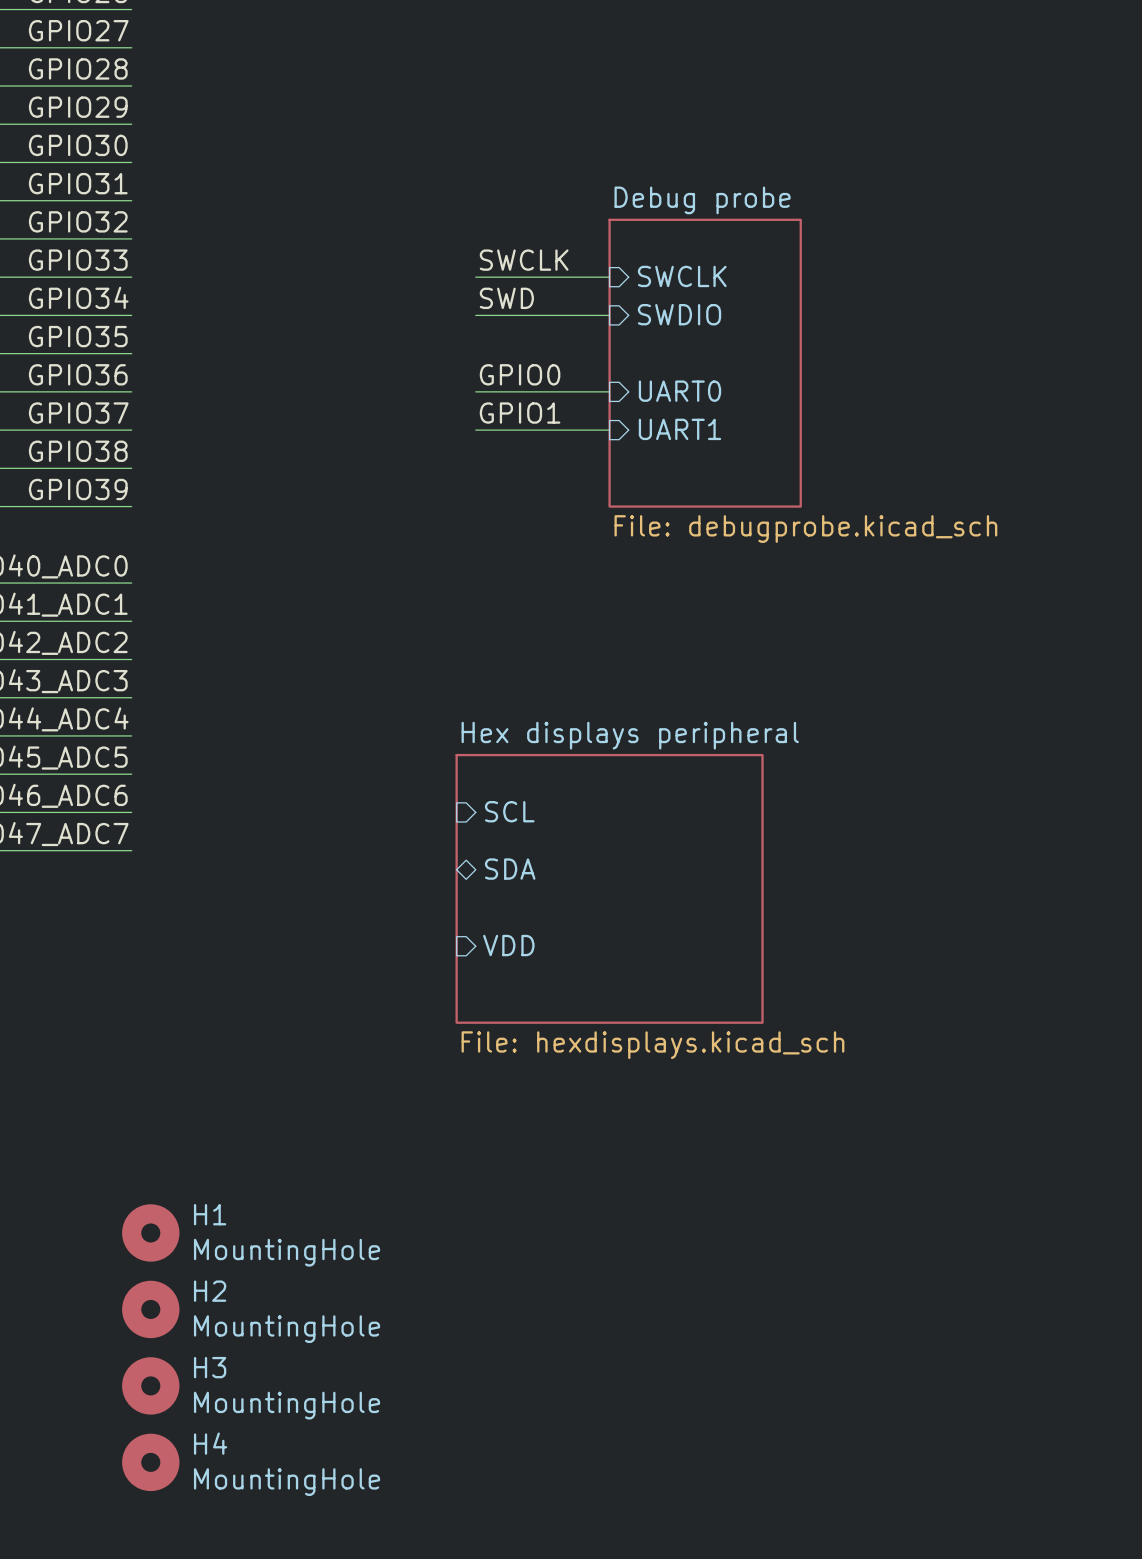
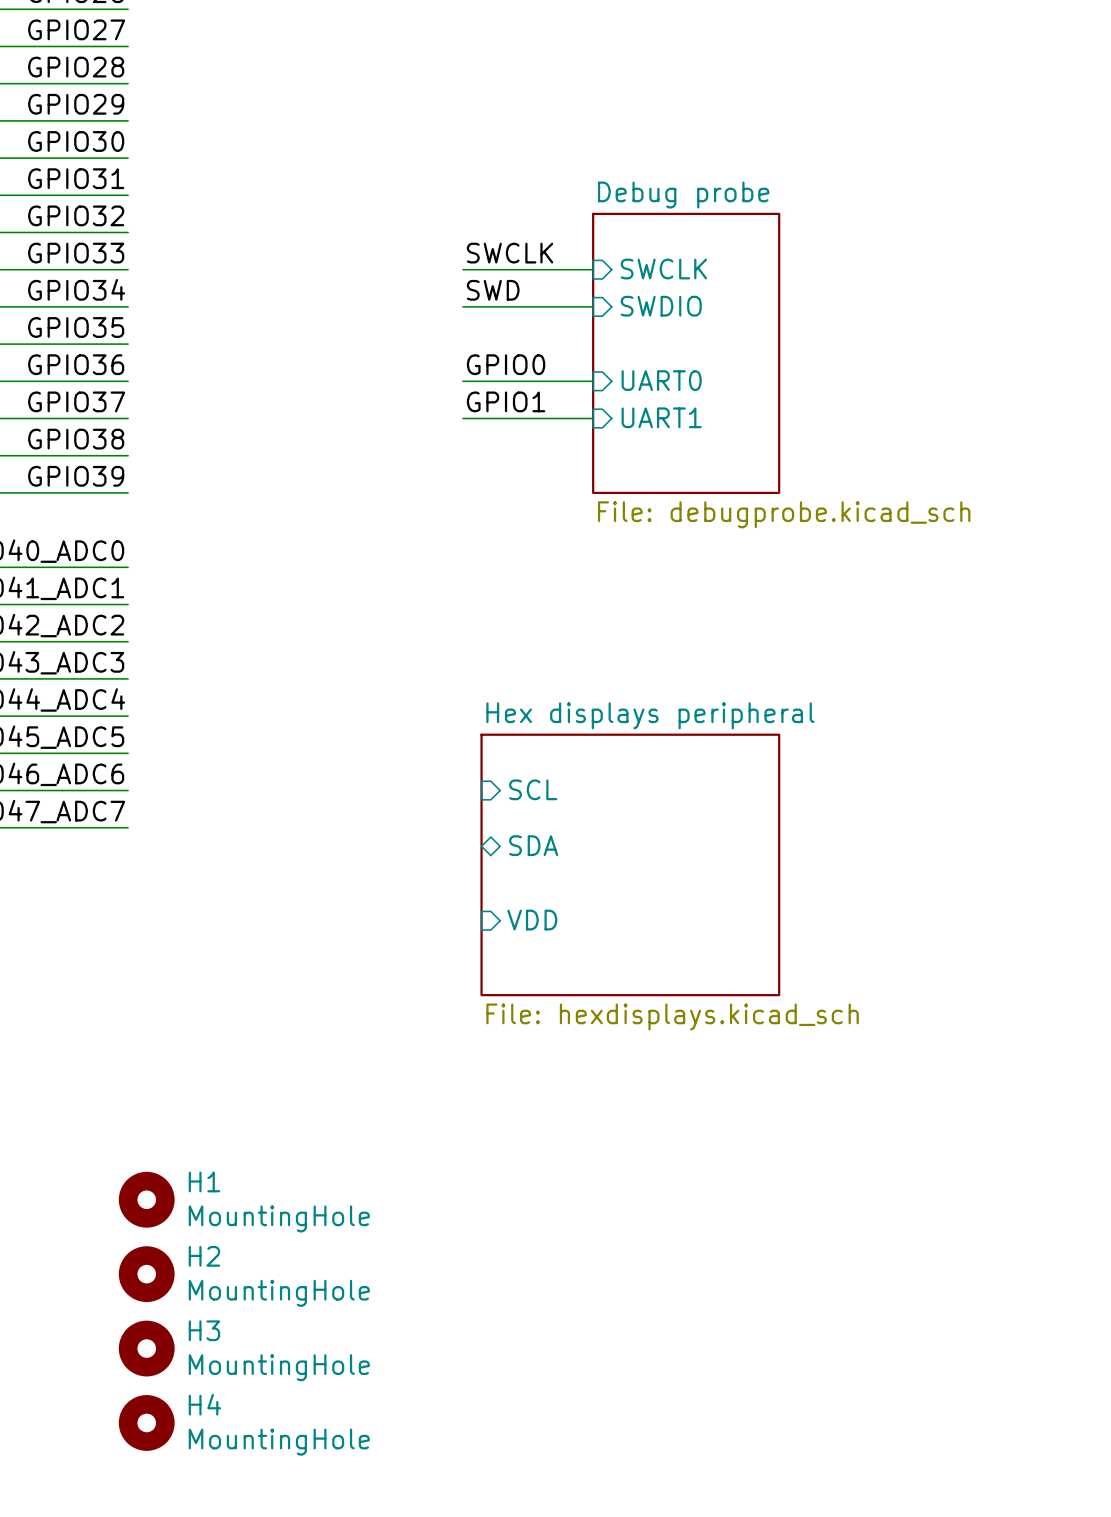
sheet pin position: SCL (509, 811) -> SCL (533, 789)
sheet pin position: SDA (510, 869) -> SDA (533, 845)
sheet Hex displays peripheral position: (609, 888) -> (630, 864)
sheet pin position: VDD (508, 945) -> VDD (532, 920)

